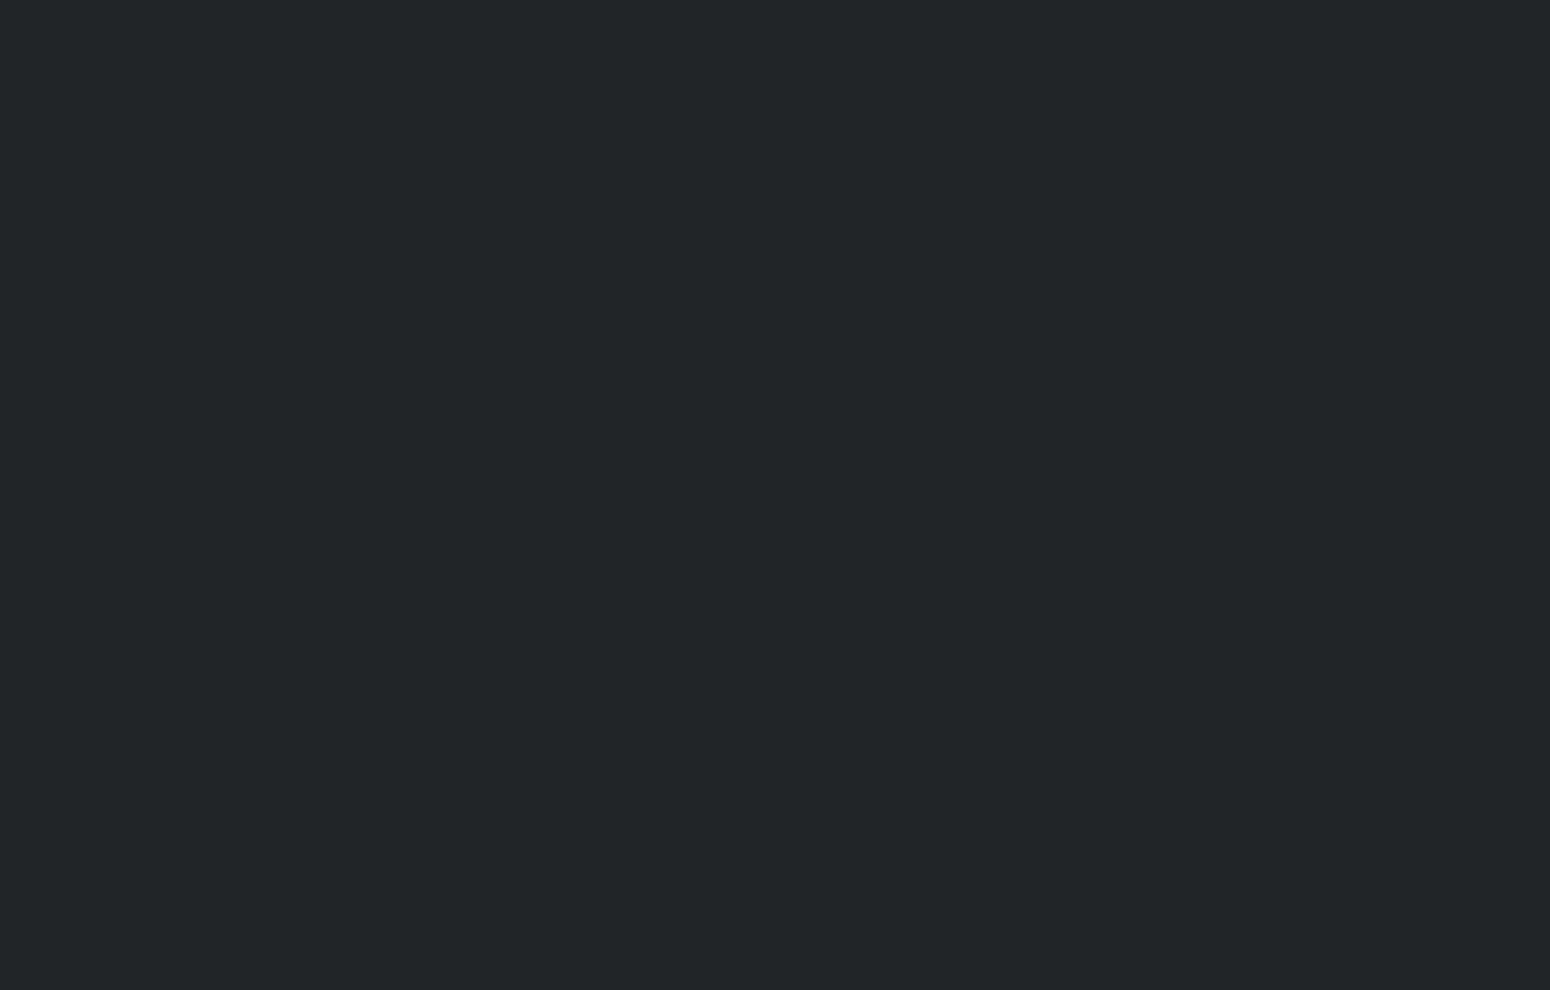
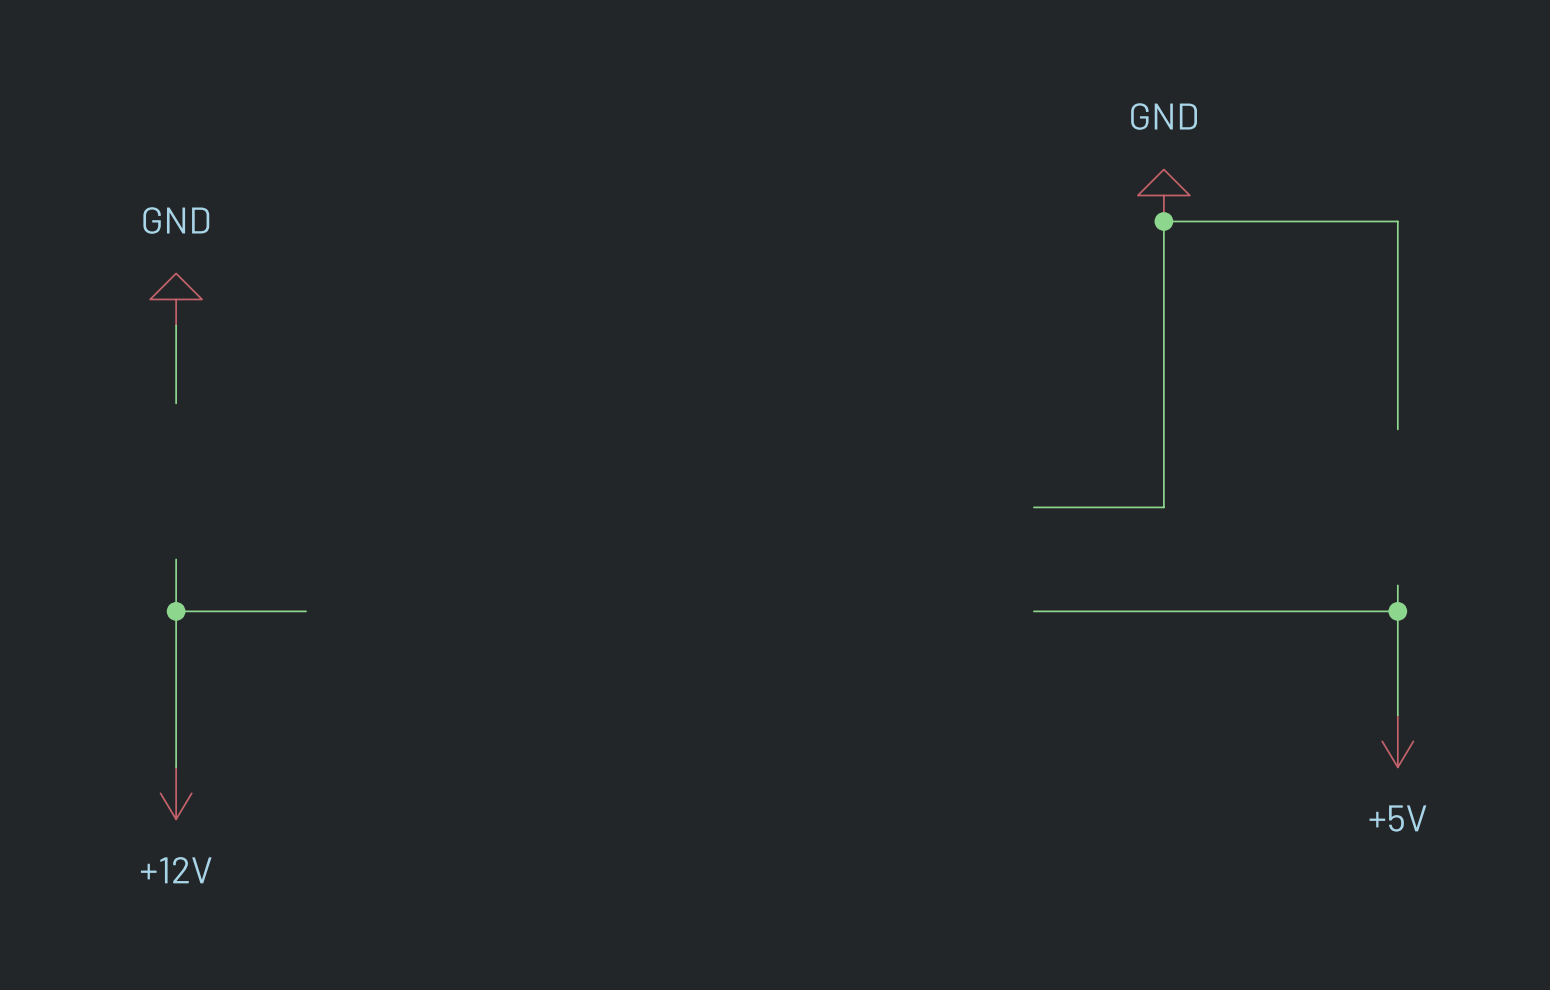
power symbol: none -> GND (1163, 195)
junction: none -> (1163, 221)
power symbol: none -> GND (176, 299)
wire: none -> (176, 325) (176, 403)
wire: none -> (1397, 429) (1397, 221) (1163, 221) (1163, 507) (1033, 507)
wire: none -> (176, 559) (176, 767)
wire: none -> (1397, 585) (1397, 715)
wire: none -> (176, 611) (306, 611)
junction: none -> (176, 611)
wire: none -> (1033, 611) (1397, 611)
junction: none -> (1397, 611)
power symbol: none -> +5V (1397, 741)
power symbol: none -> +12V (176, 793)

